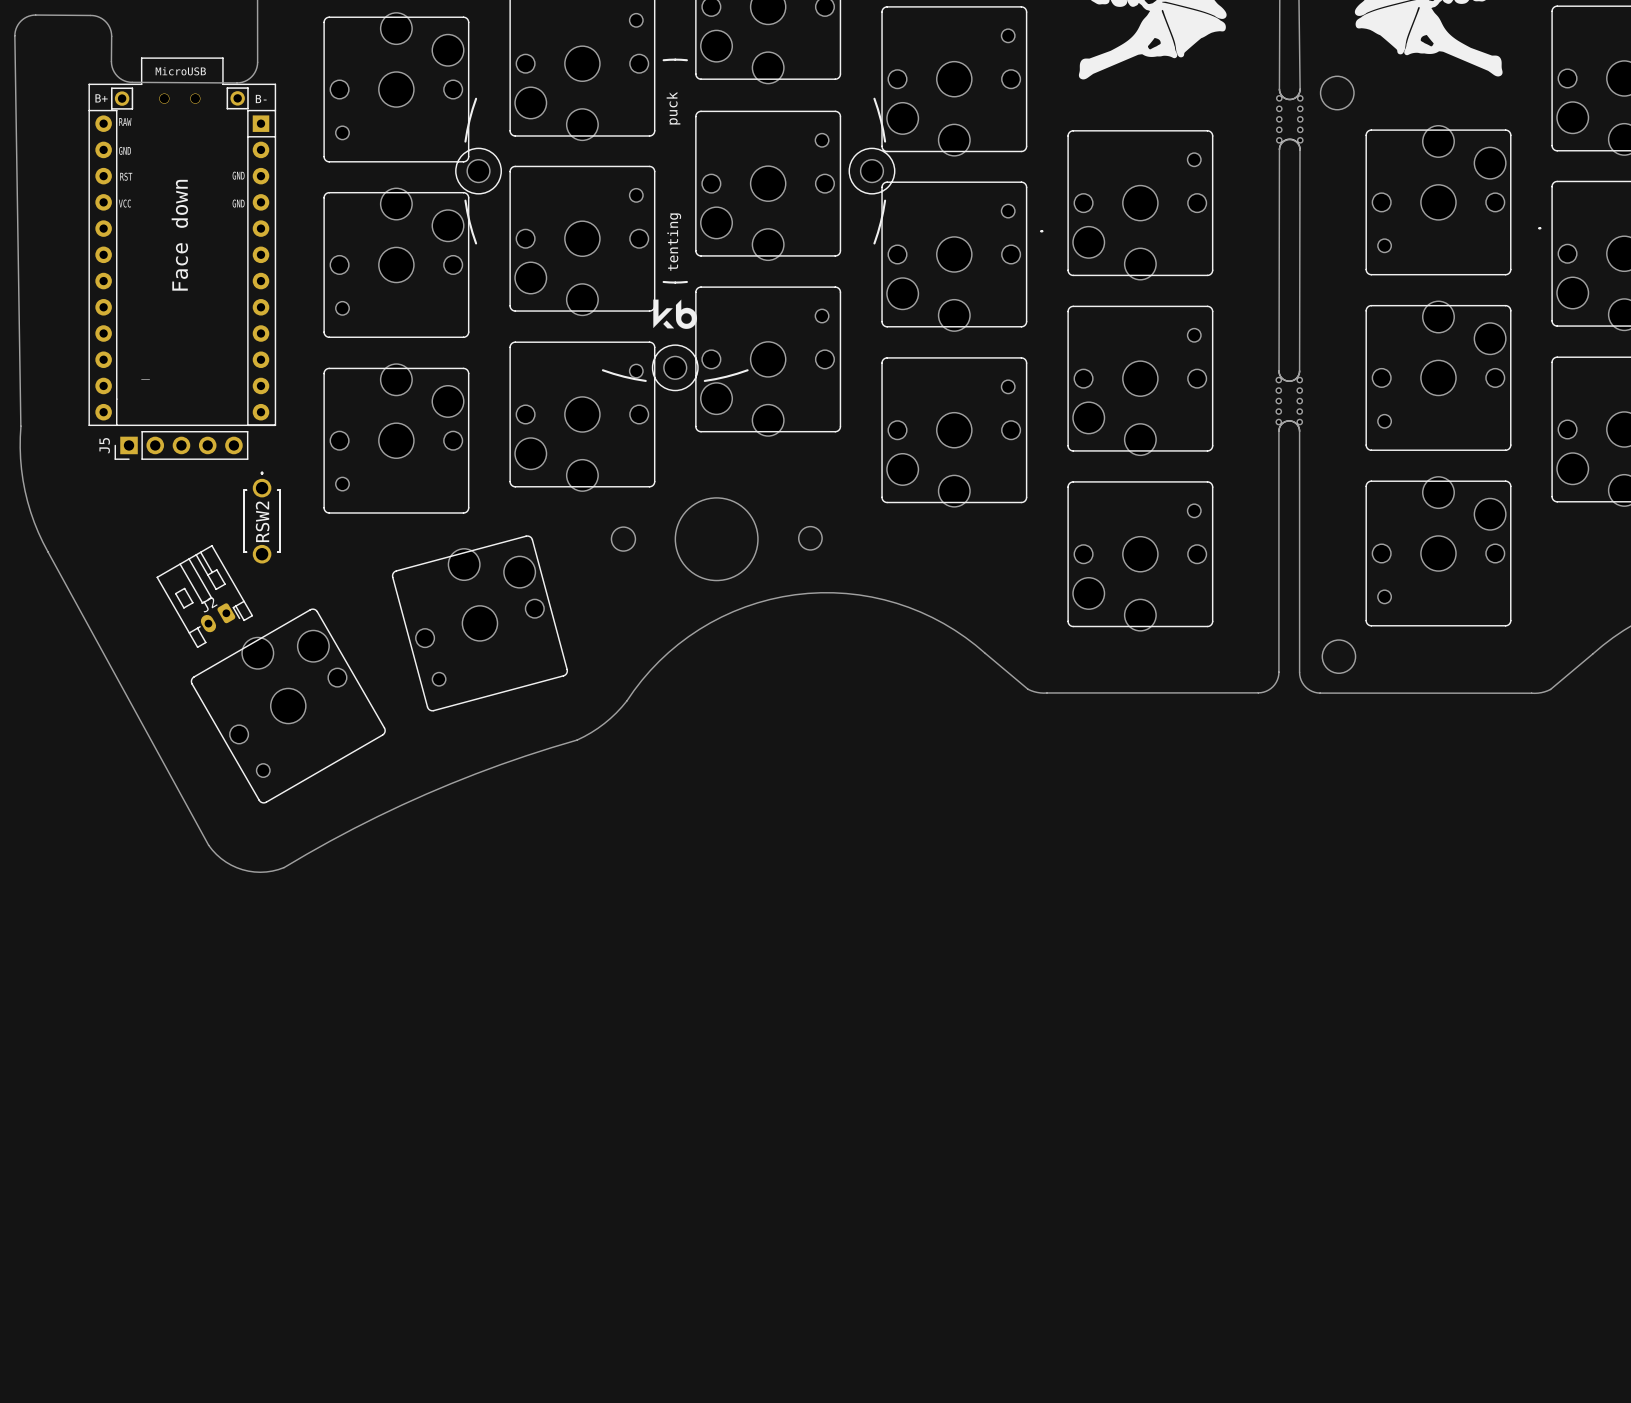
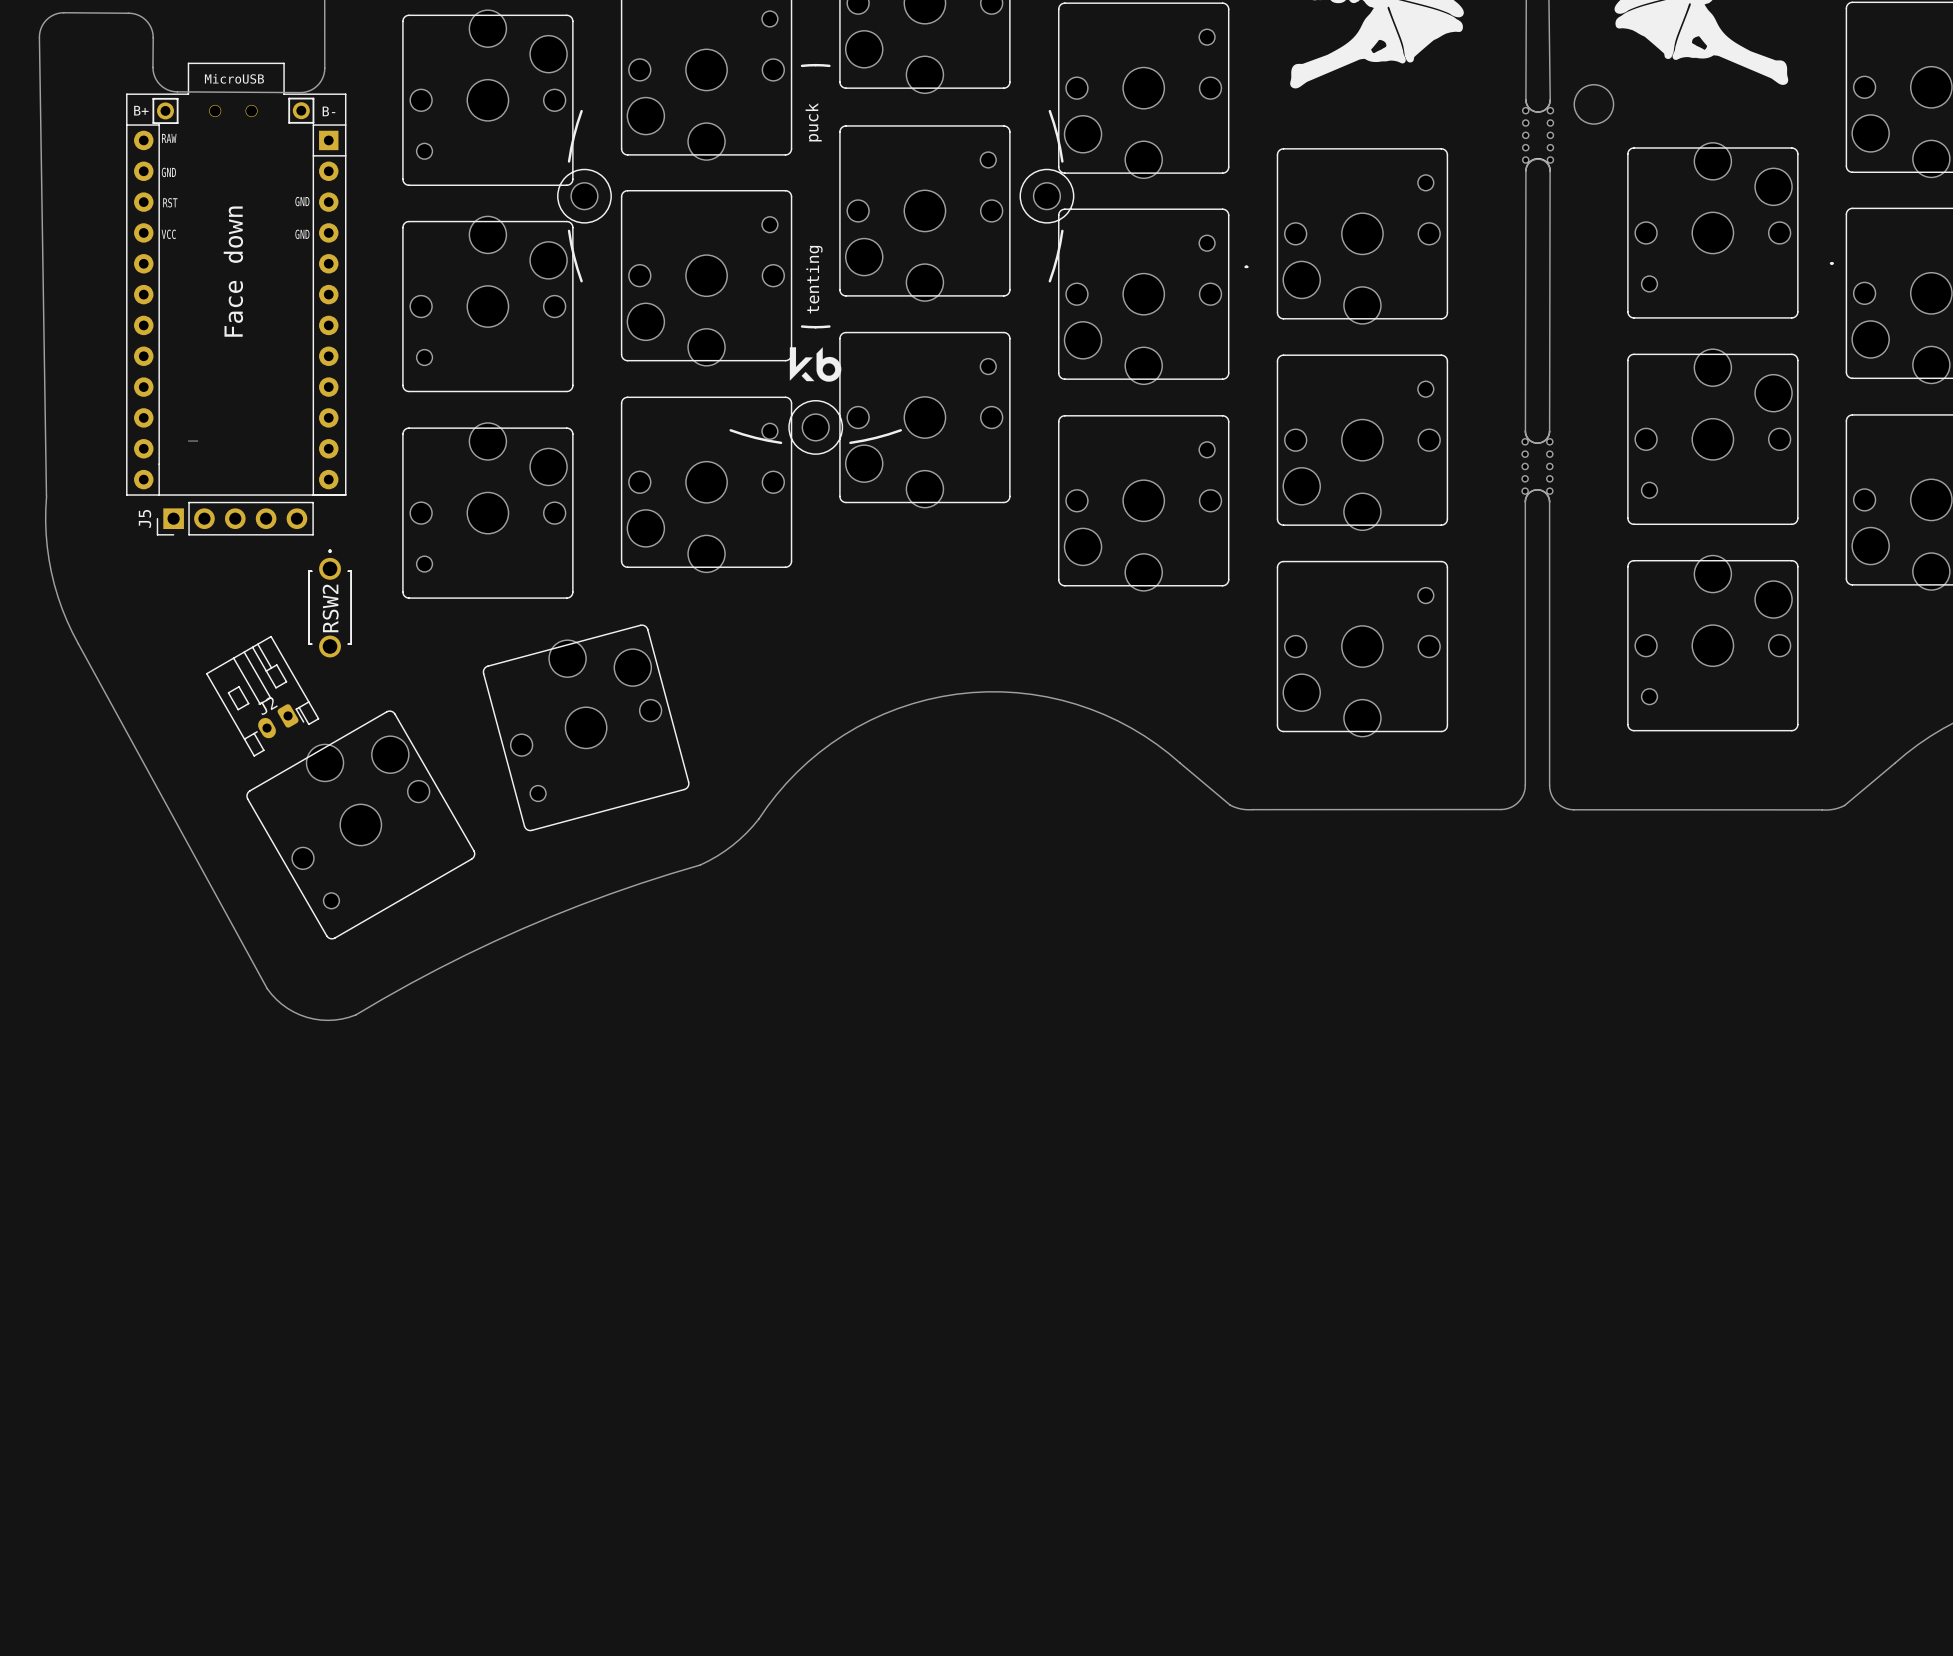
round board edge: [674, 497, 759, 582] -> none
round board edge: [610, 526, 636, 552] -> none
round board edge: [798, 526, 823, 551] -> none
round board edge: [1321, 639, 1357, 674] -> none

